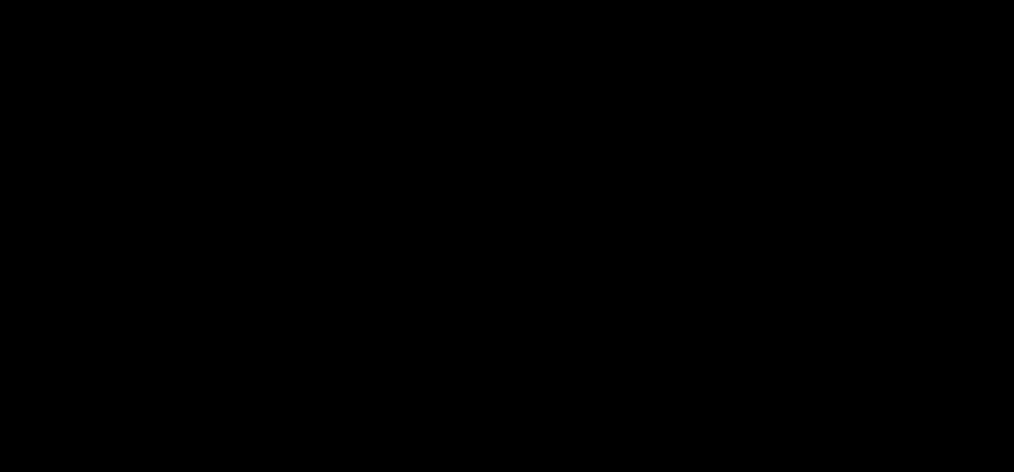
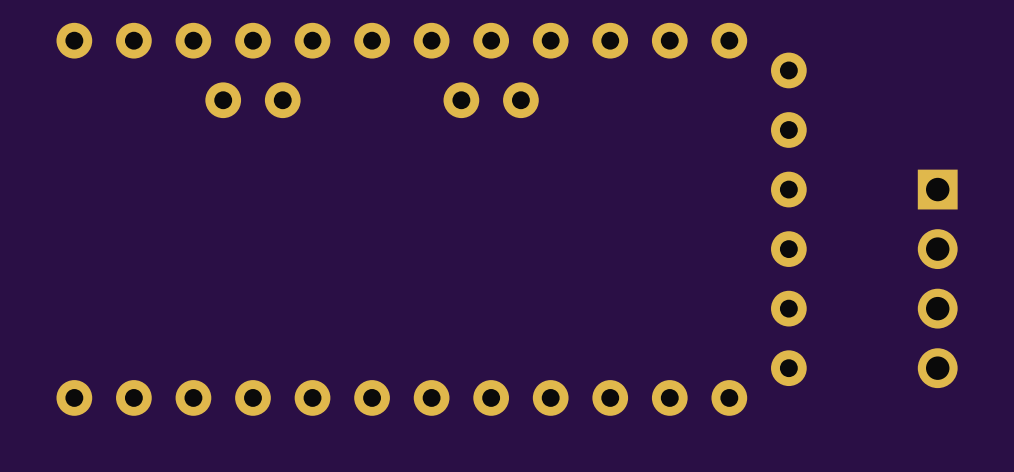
part: none -> (431, 219)
part: none -> (937, 278)

